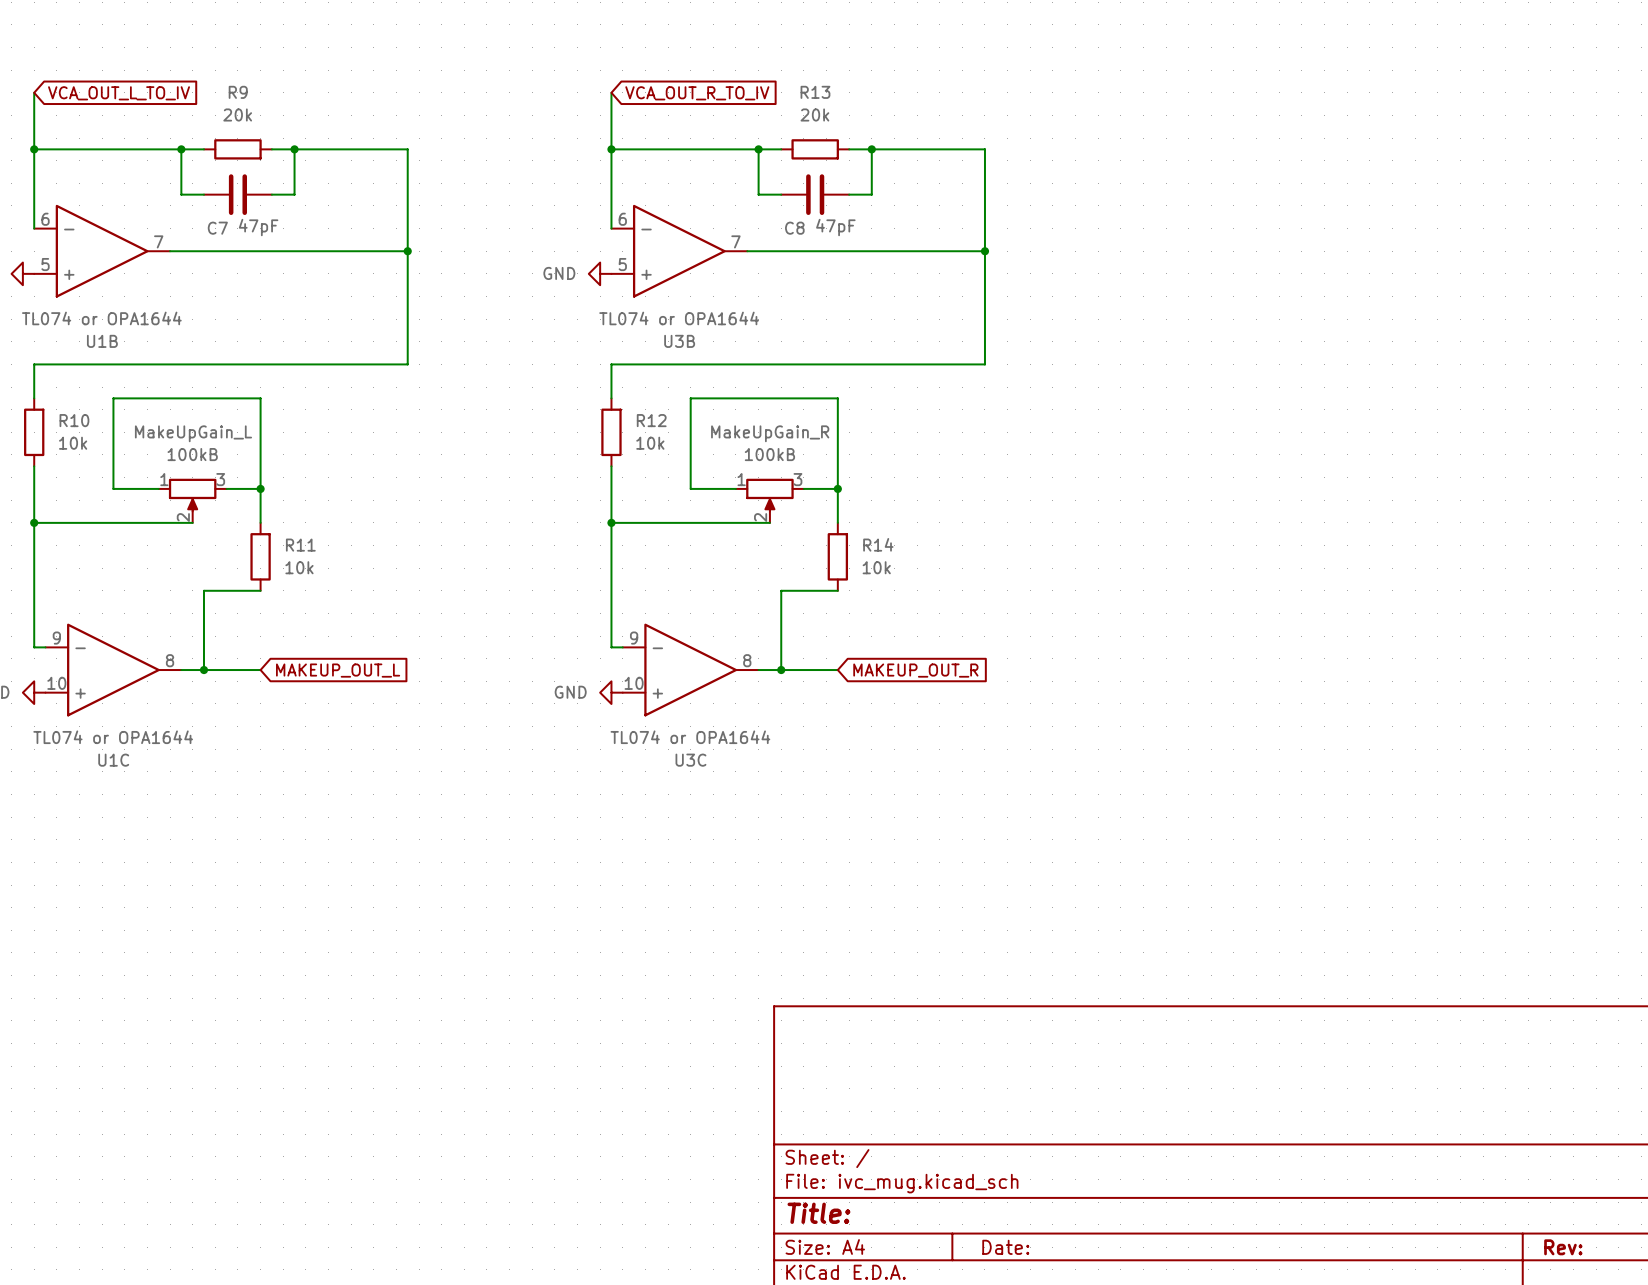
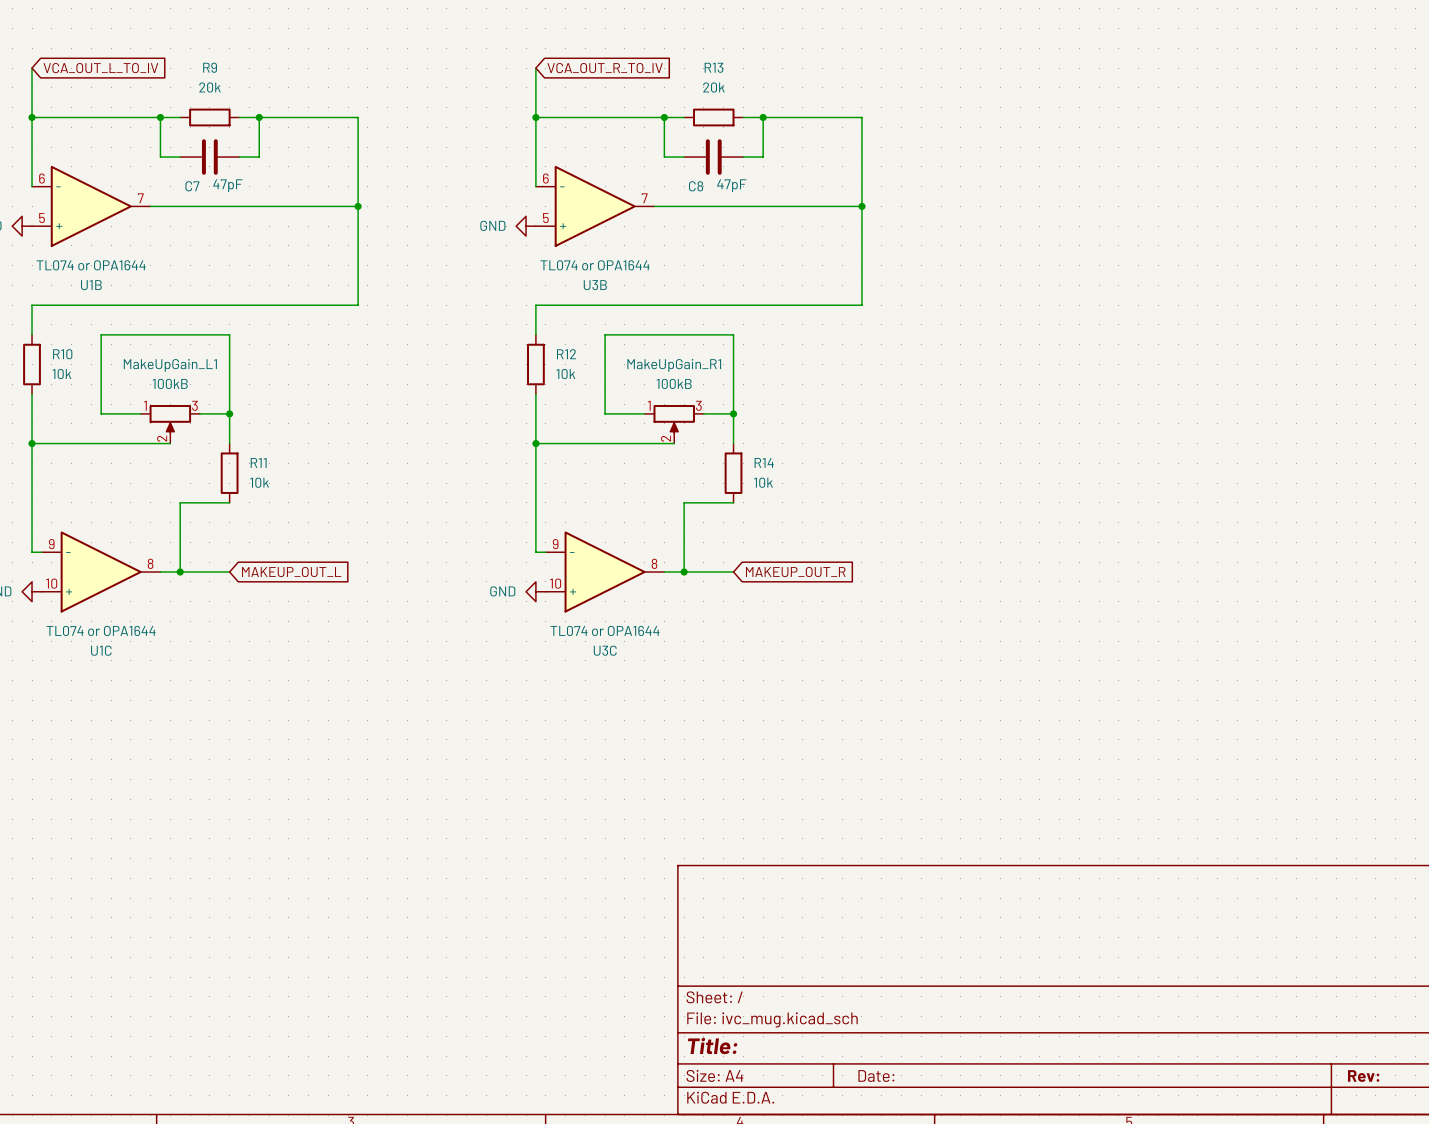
MakeUpGain_L name: MakeUpGain_L (193, 433) -> MakeUpGain_L1 (170, 365)
MakeUpGain_R name: MakeUpGain_R (770, 433) -> MakeUpGain_R1 (674, 365)

